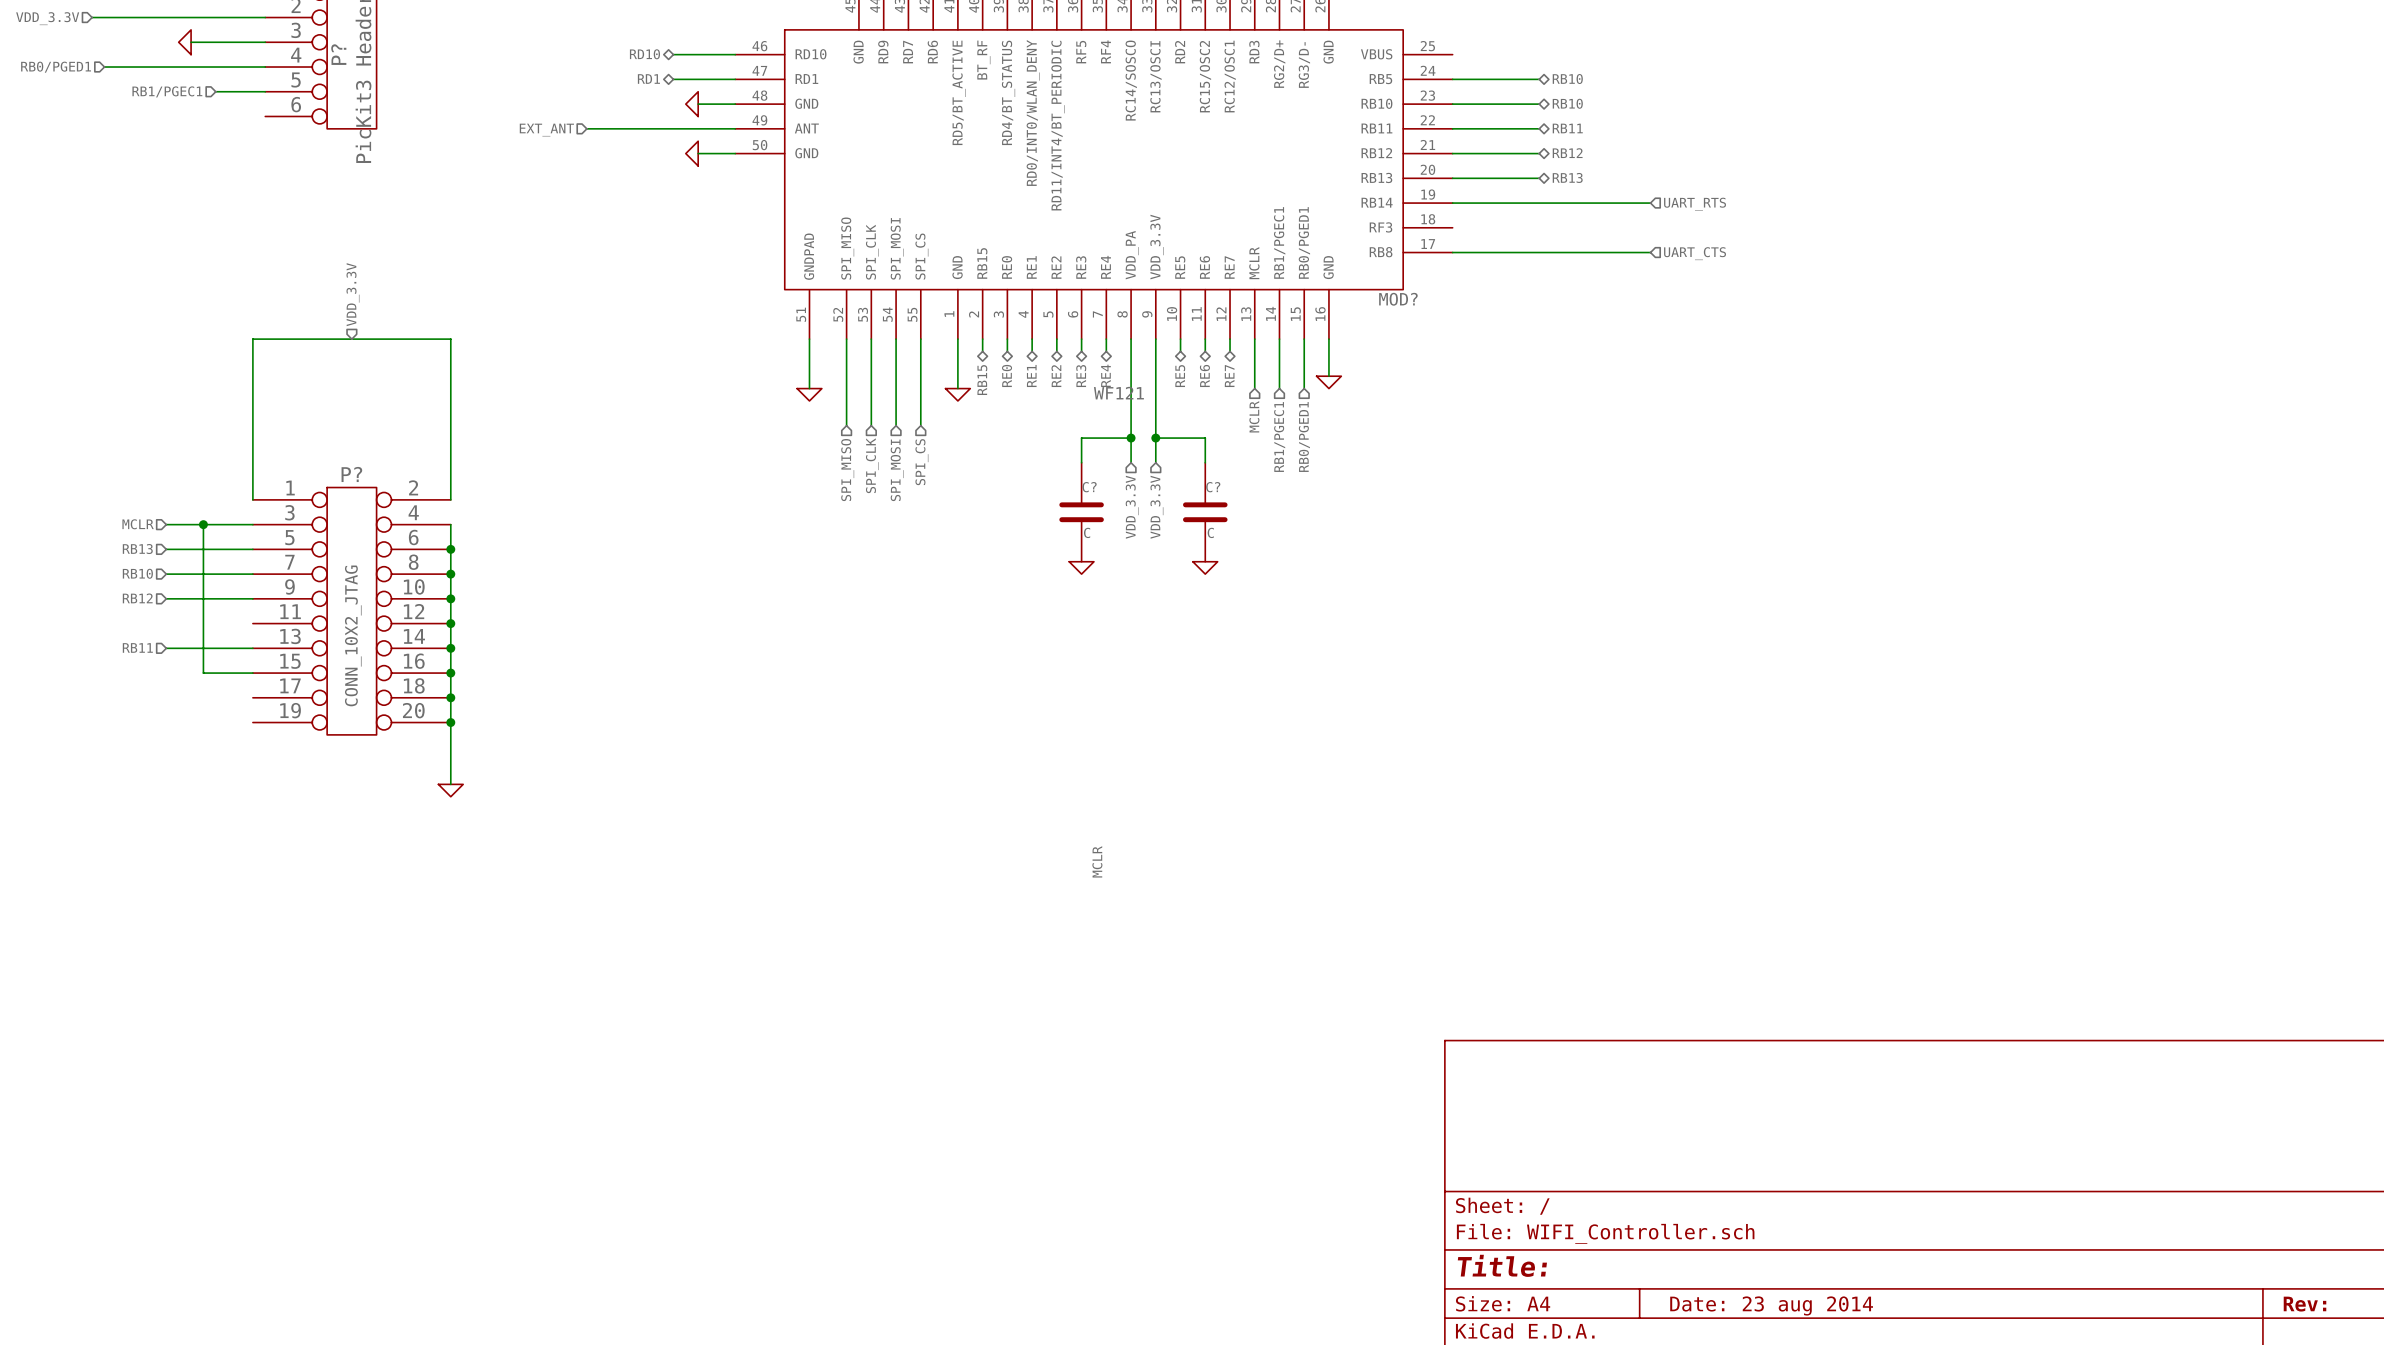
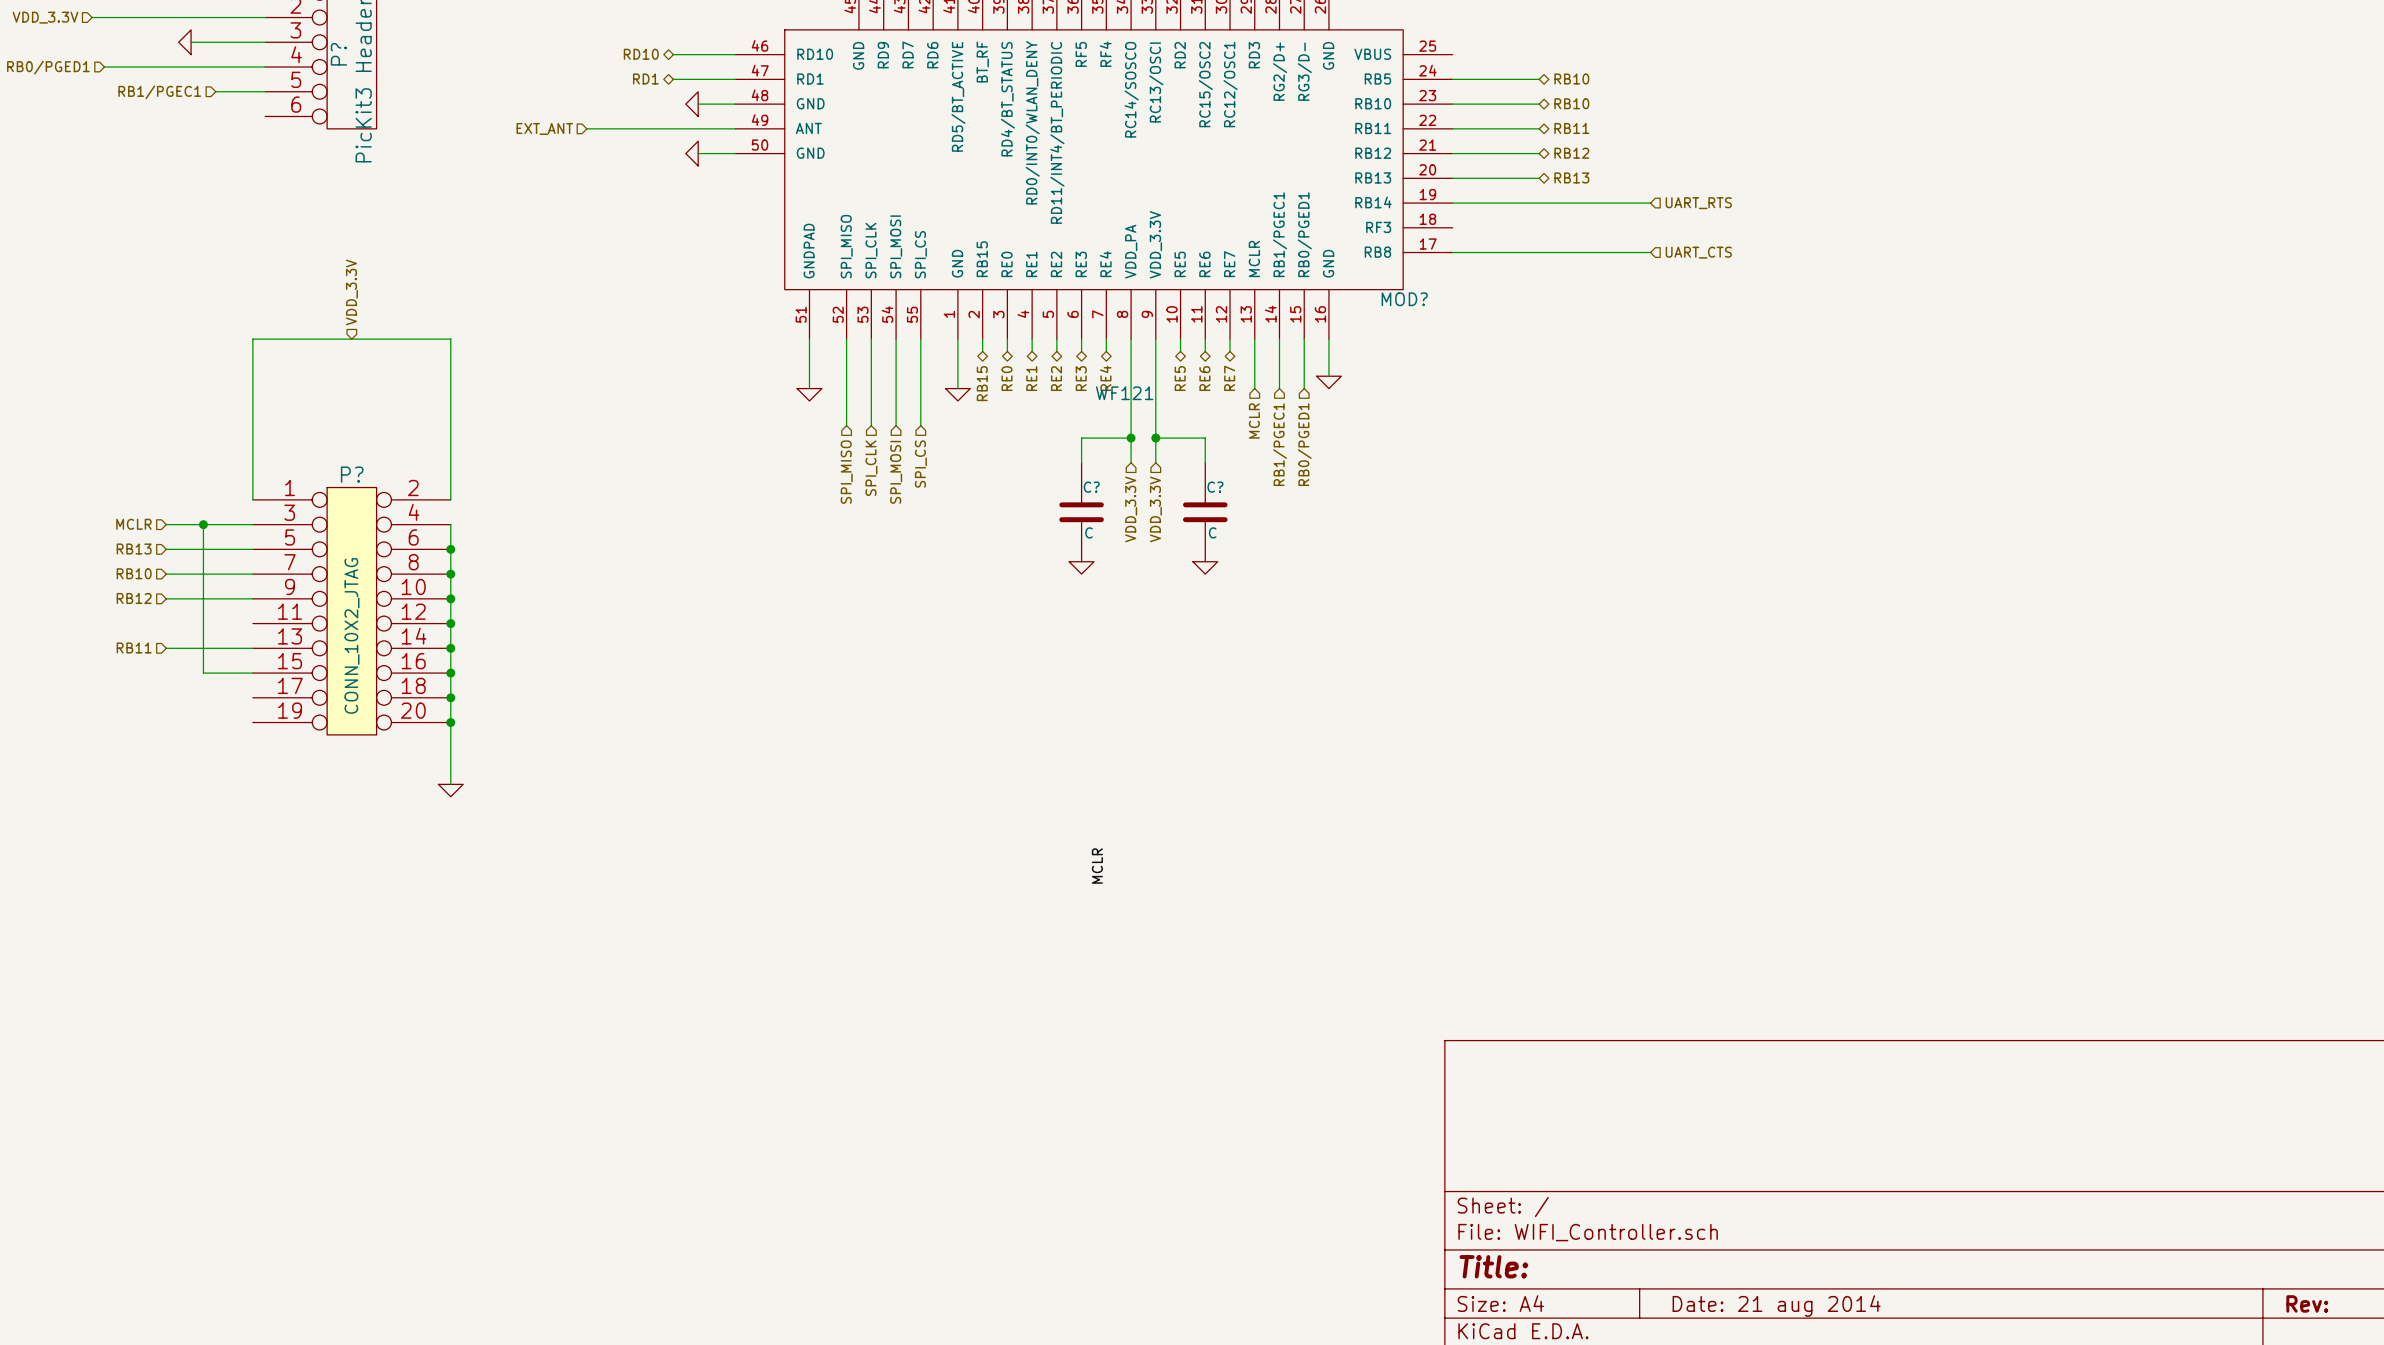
title block: Date: 23 aug 2014 (1771, 1305) -> Date: 21 aug 2014 (1776, 1306)

